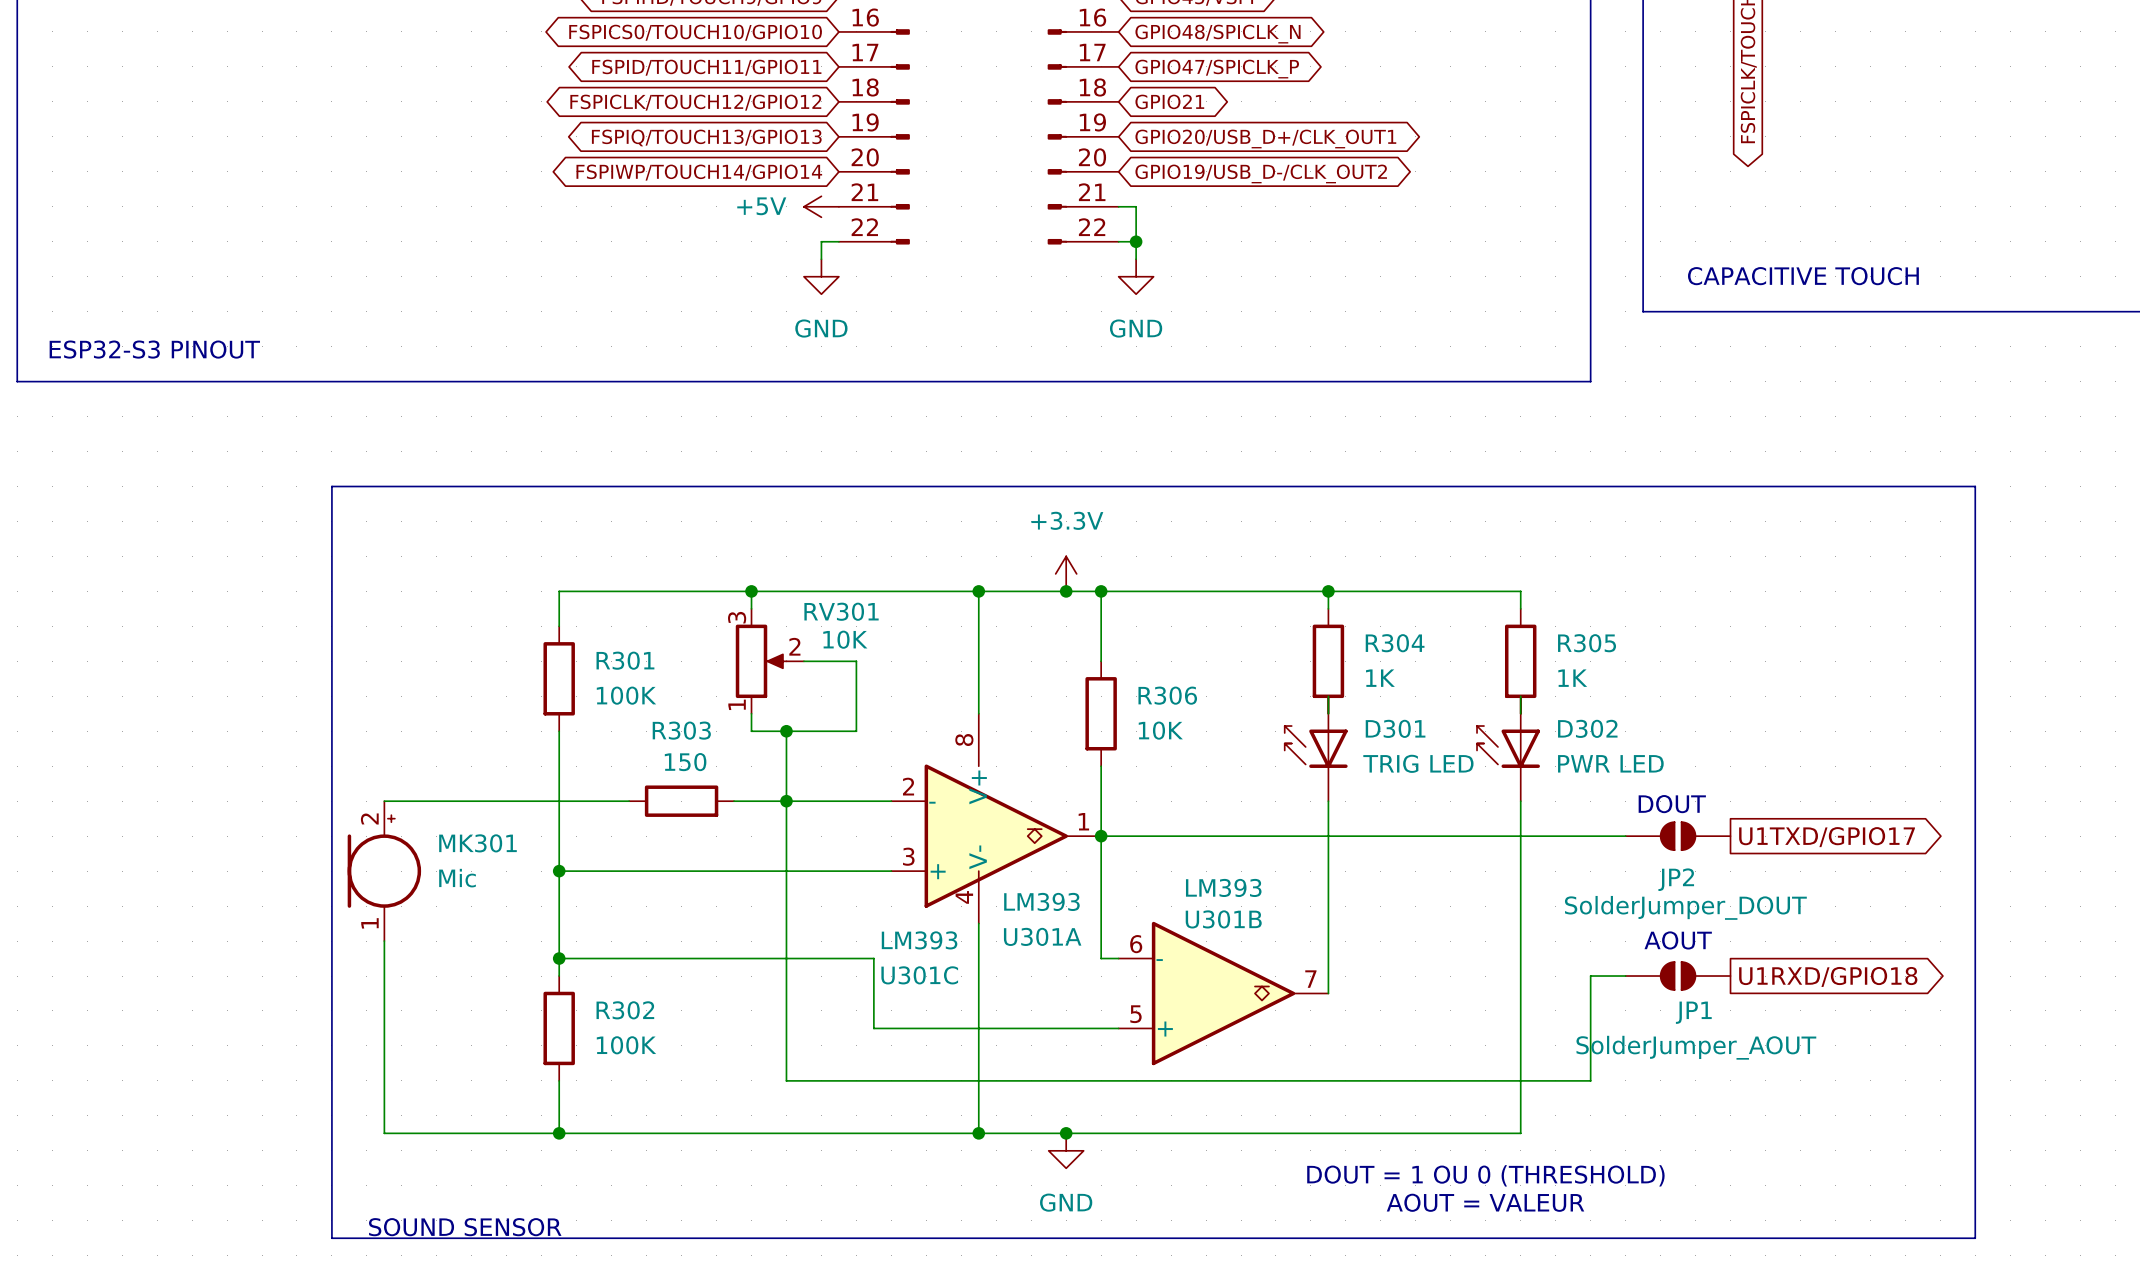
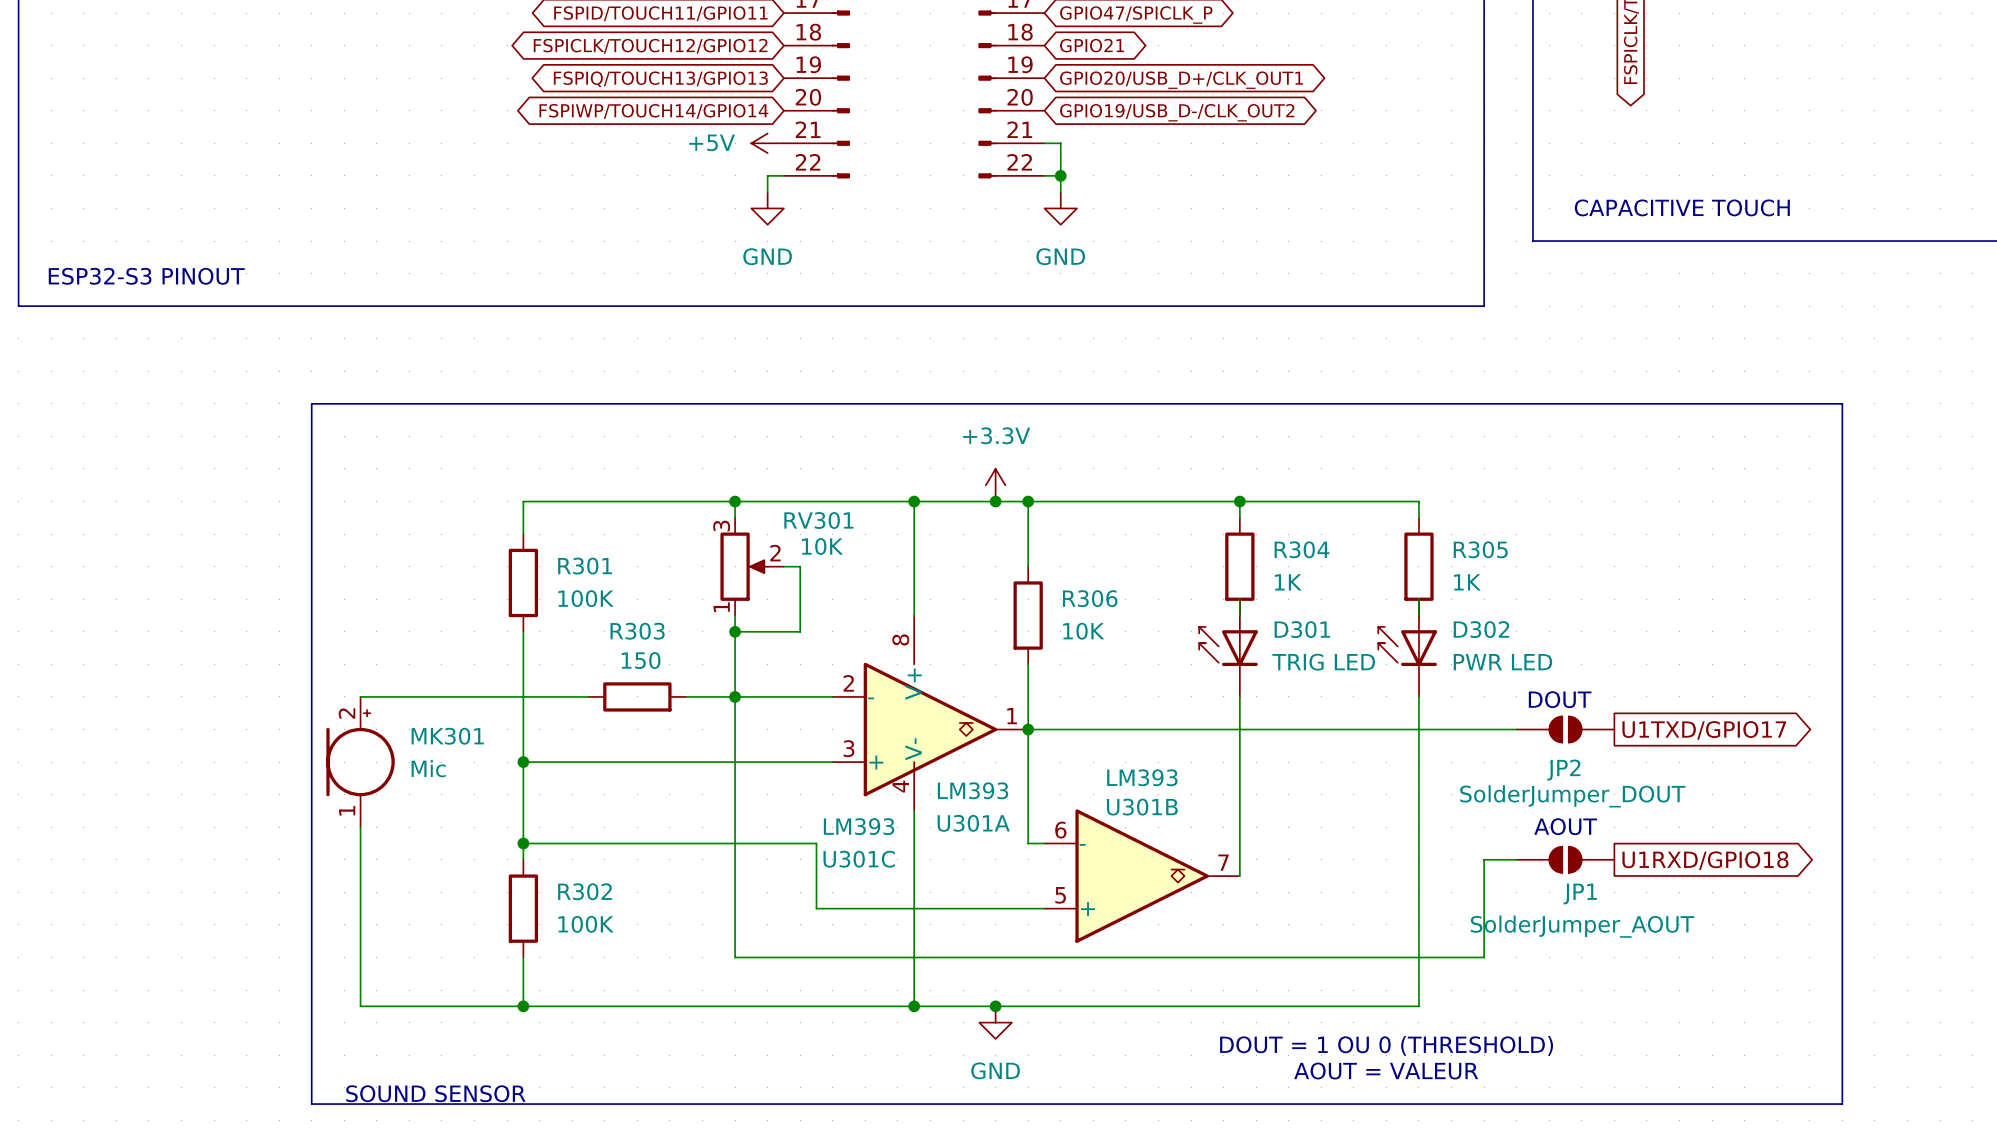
wire: (751, 591) (751, 608) -> (735, 501) (735, 517)
junction position: (751, 591) -> (735, 501)
RV301 position: (769, 661) -> (752, 566)
wire: (751, 713) (751, 731) (786, 731) -> (735, 615) (735, 631)

